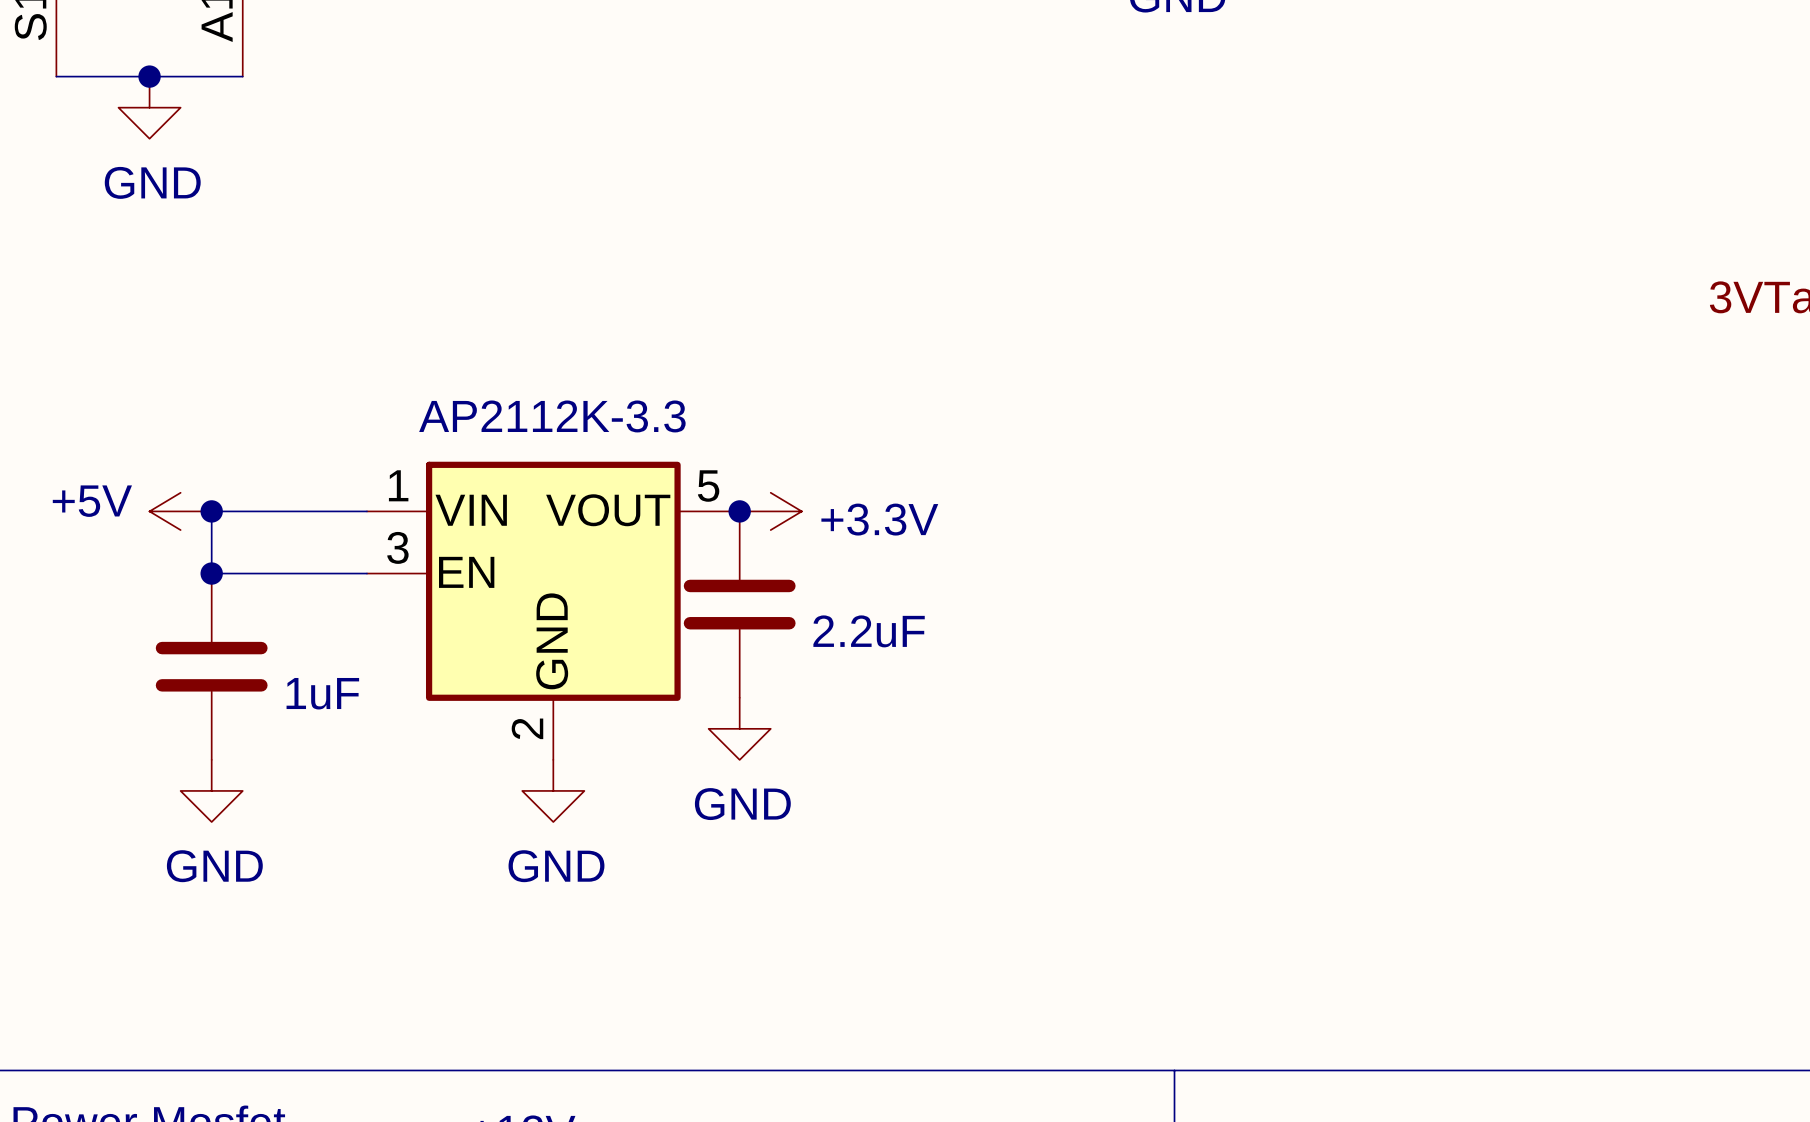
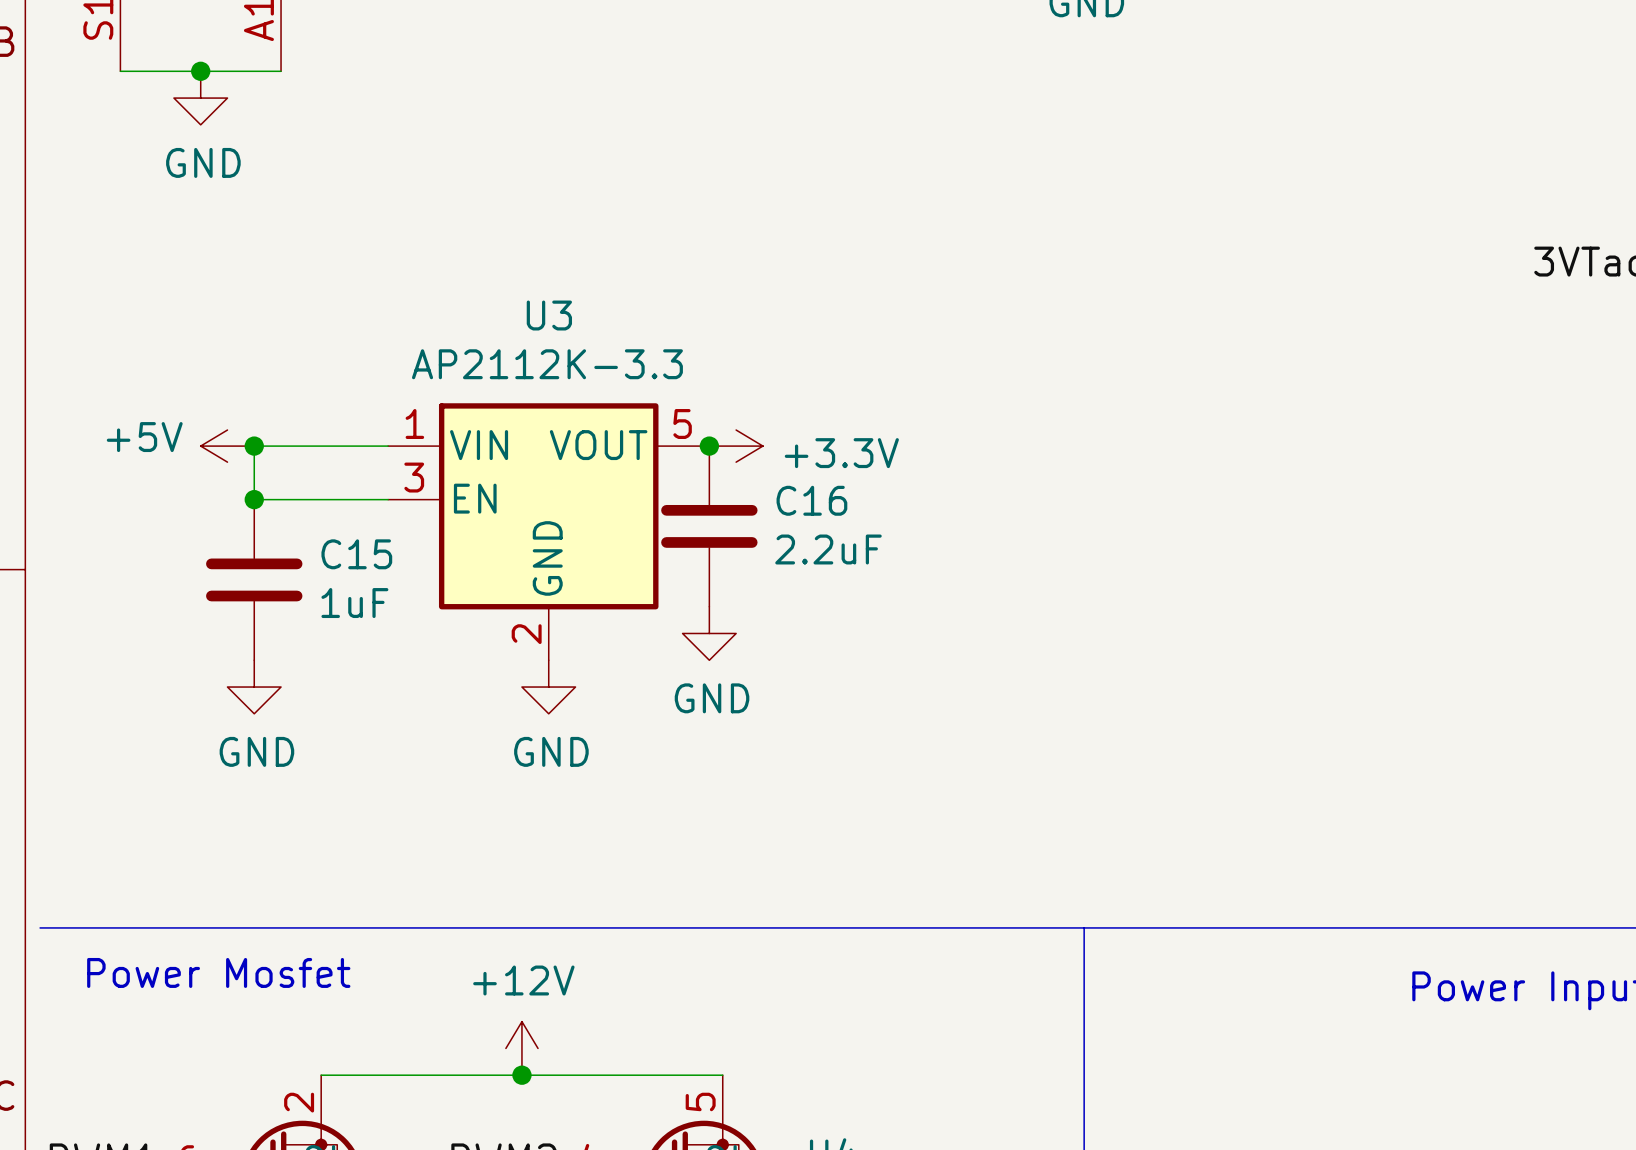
U3 name: none -> U3 (549, 315)
C16 name: none -> C16 (811, 500)
C15 name: none -> C15 (356, 554)

